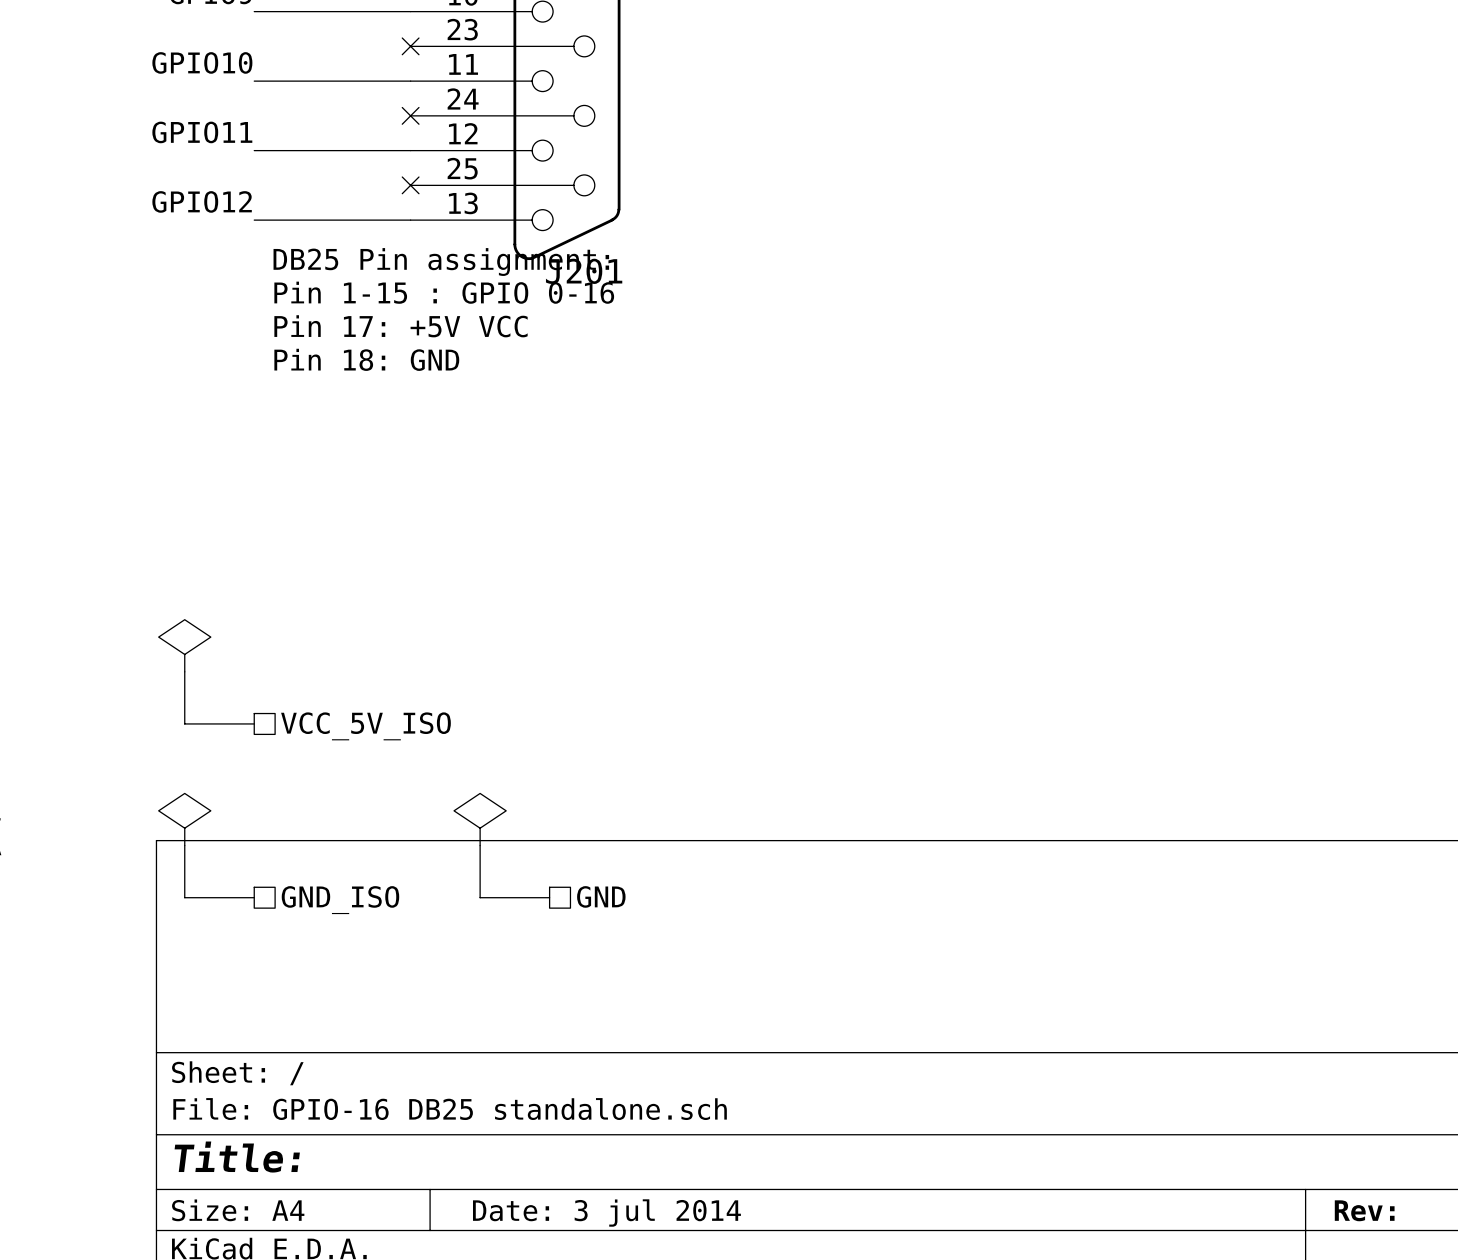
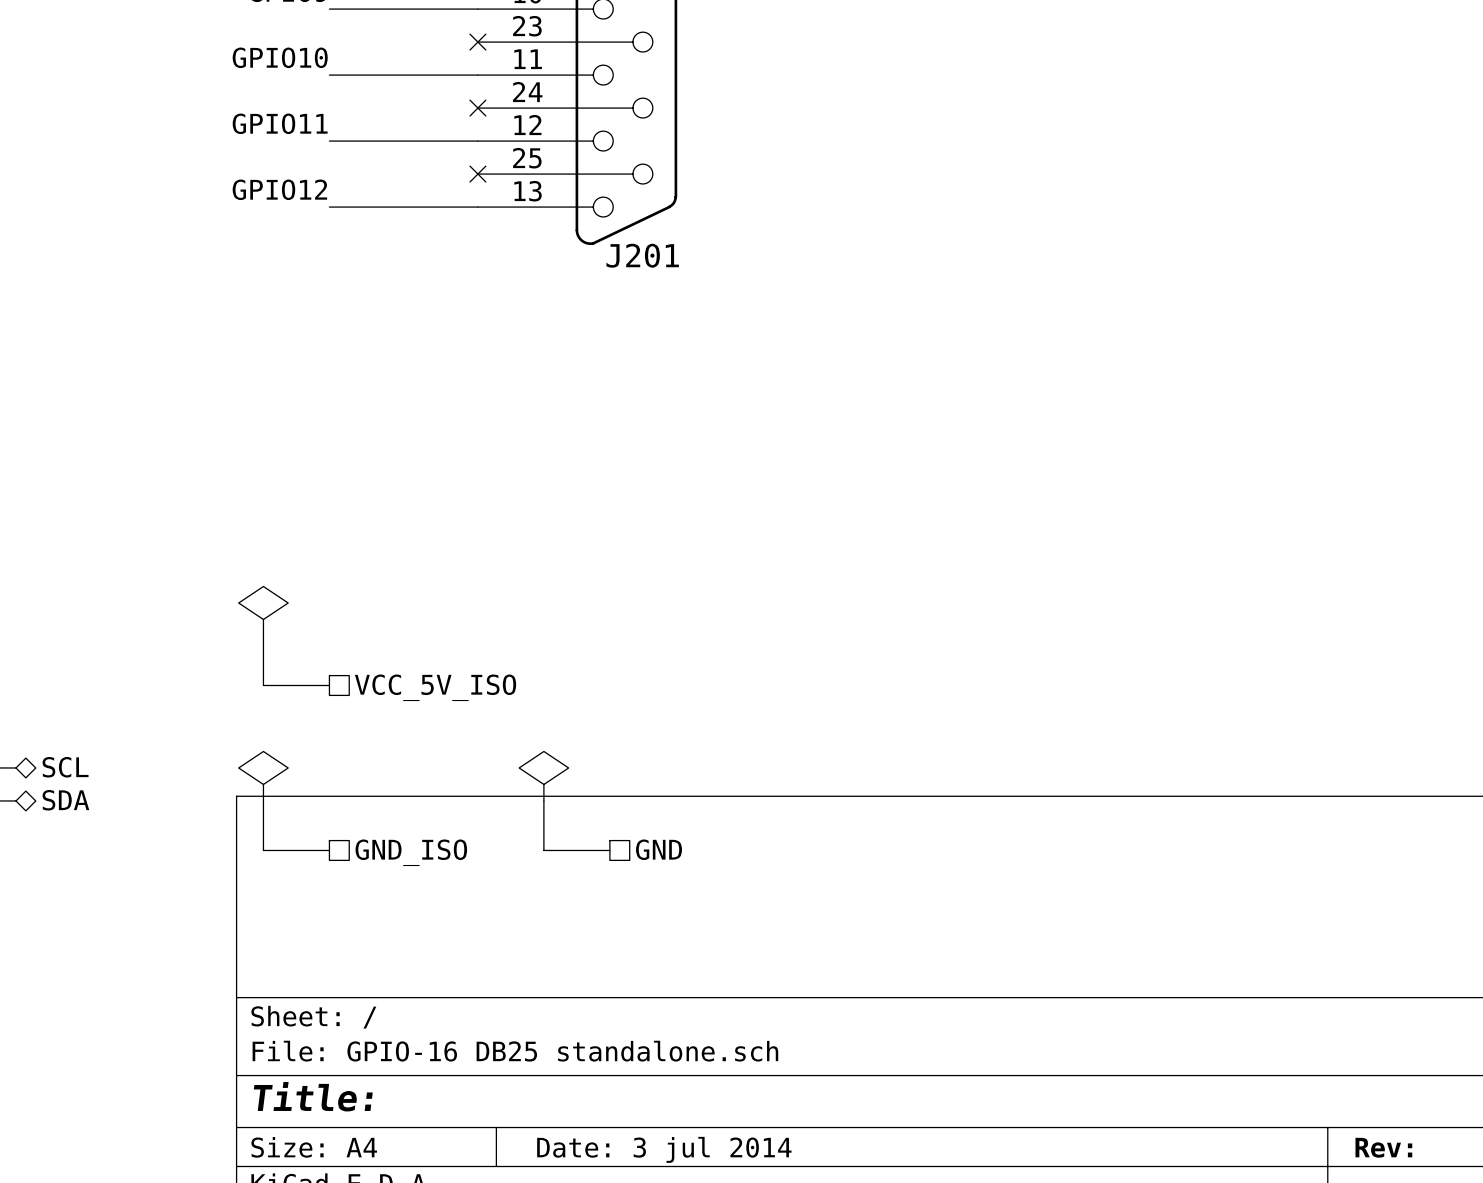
text: DB25 Pin assignment: (441, 262) -> none
text: Pin 1-15 : GPIO 0-16 (444, 292) -> none
text: Pin 17: +5V VCC (401, 326) -> none
text: Pin 18: GND (366, 359) -> none

